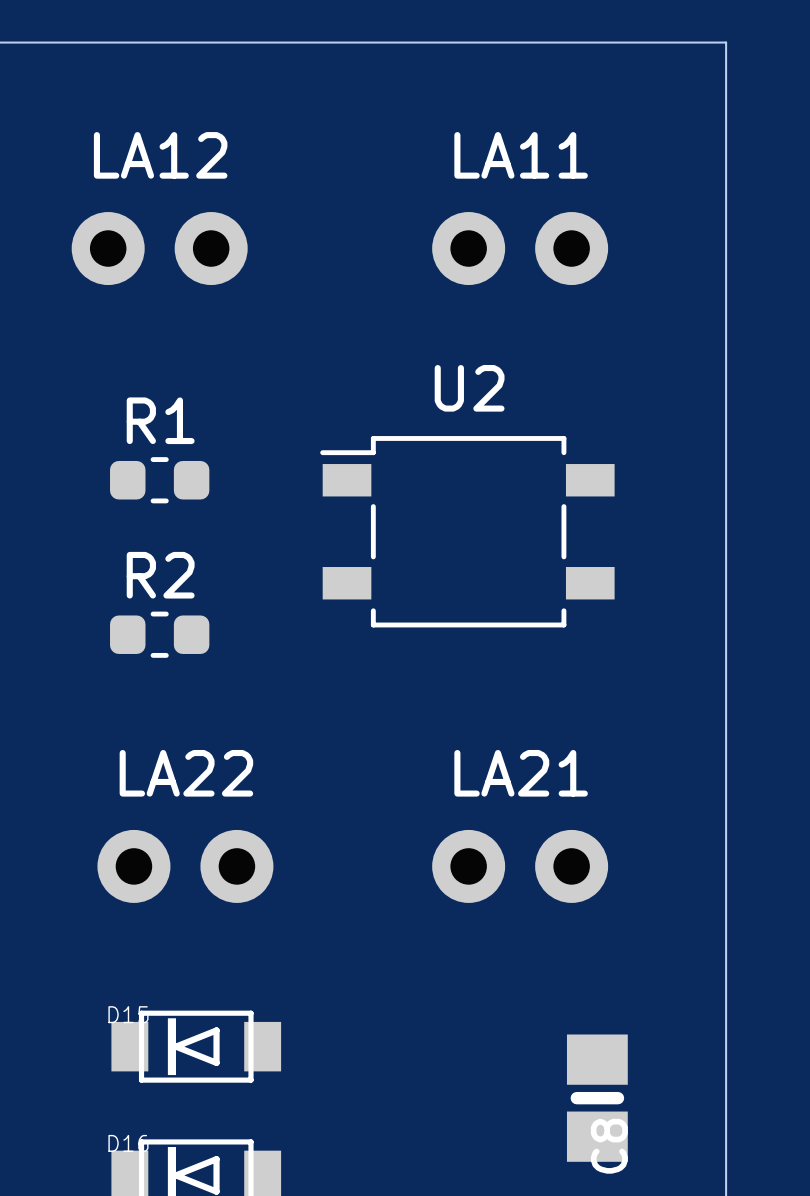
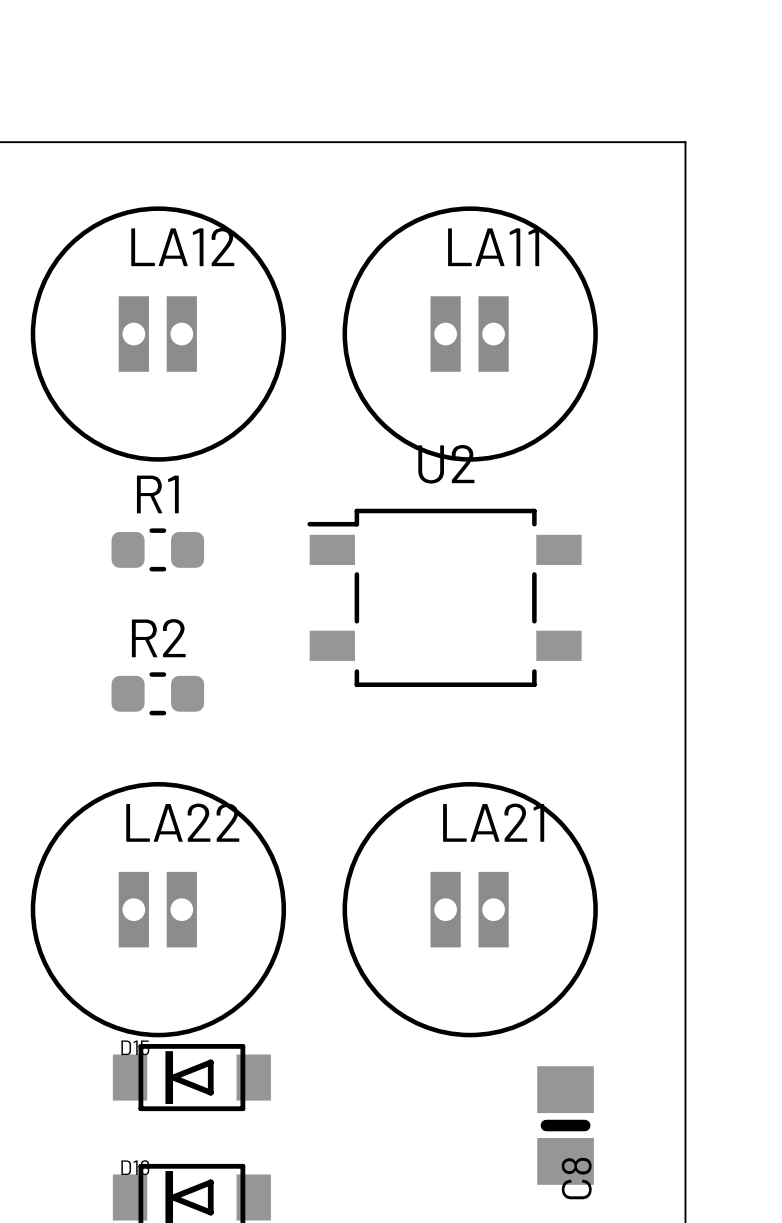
LA12 footprint: [71, 212, 248, 286] -> [30, 206, 287, 462]
LA11 footprint: [432, 212, 609, 286] -> [342, 206, 598, 462]
LA22 footprint: [97, 829, 274, 903] -> [30, 782, 287, 1038]
LA21 footprint: [432, 829, 609, 903] -> [342, 782, 598, 1038]

